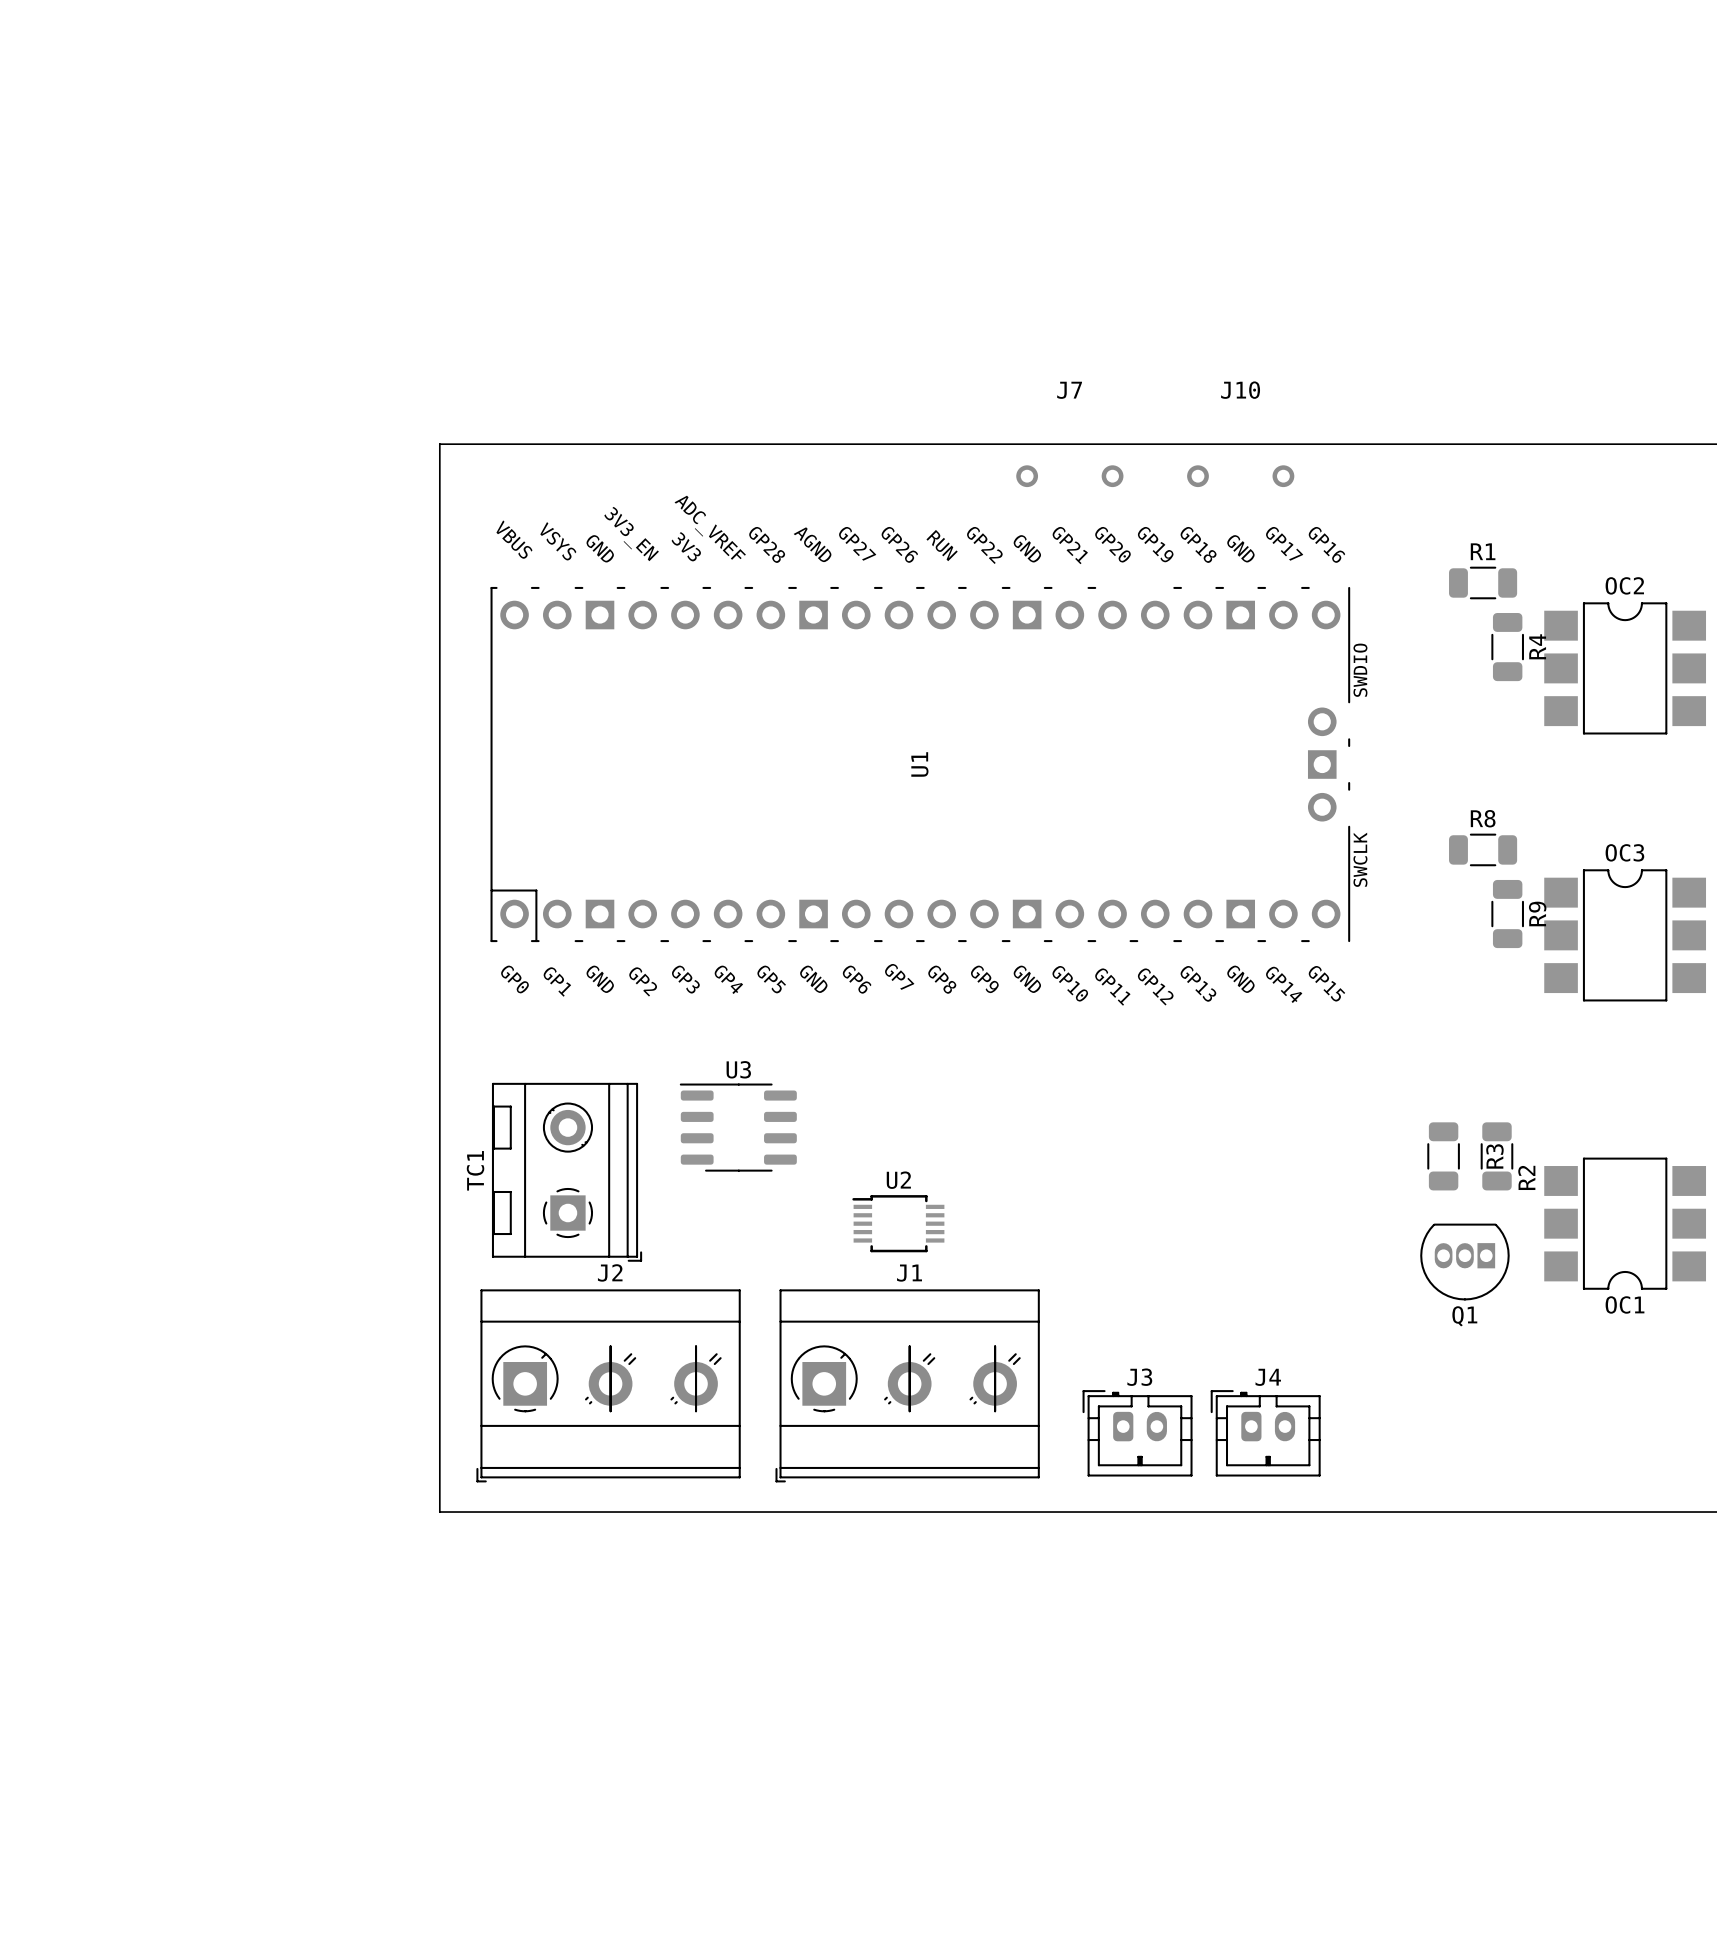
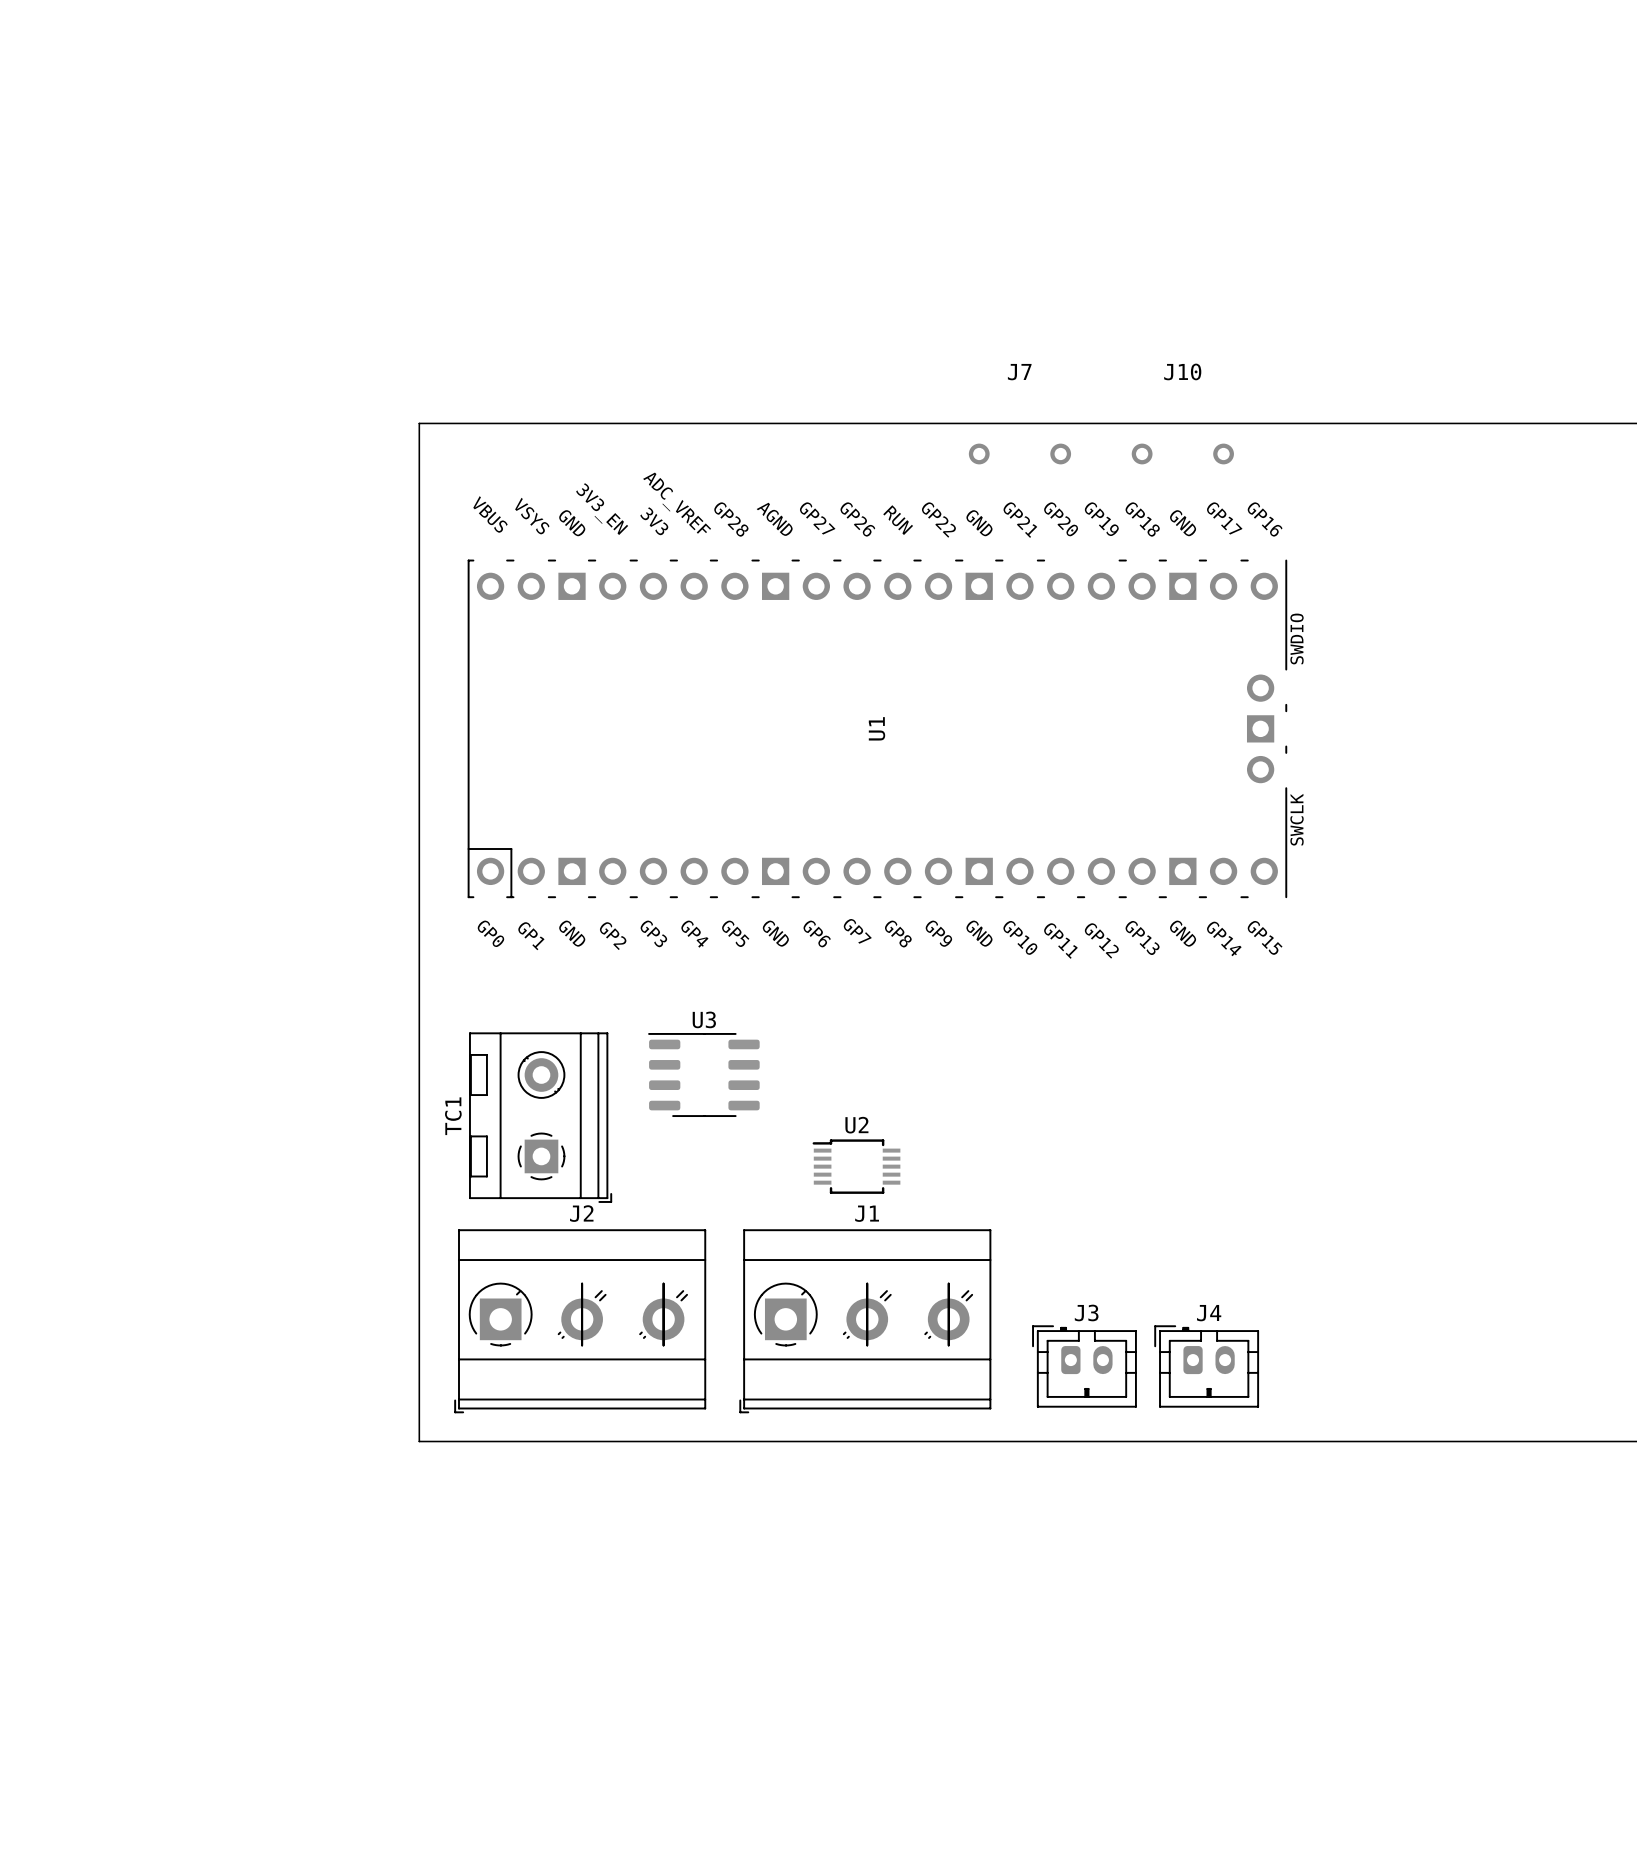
R1: (1483, 582) -> none
R4: (1507, 647) -> none
OC2: (1625, 668) -> none
R8: (1483, 849) -> none
R9: (1507, 914) -> none
OC3: (1625, 935) -> none
R3: (1443, 1156) -> none
R2: (1496, 1156) -> none
OC1: (1625, 1223) -> none
Q1: (1464, 1262) -> none

